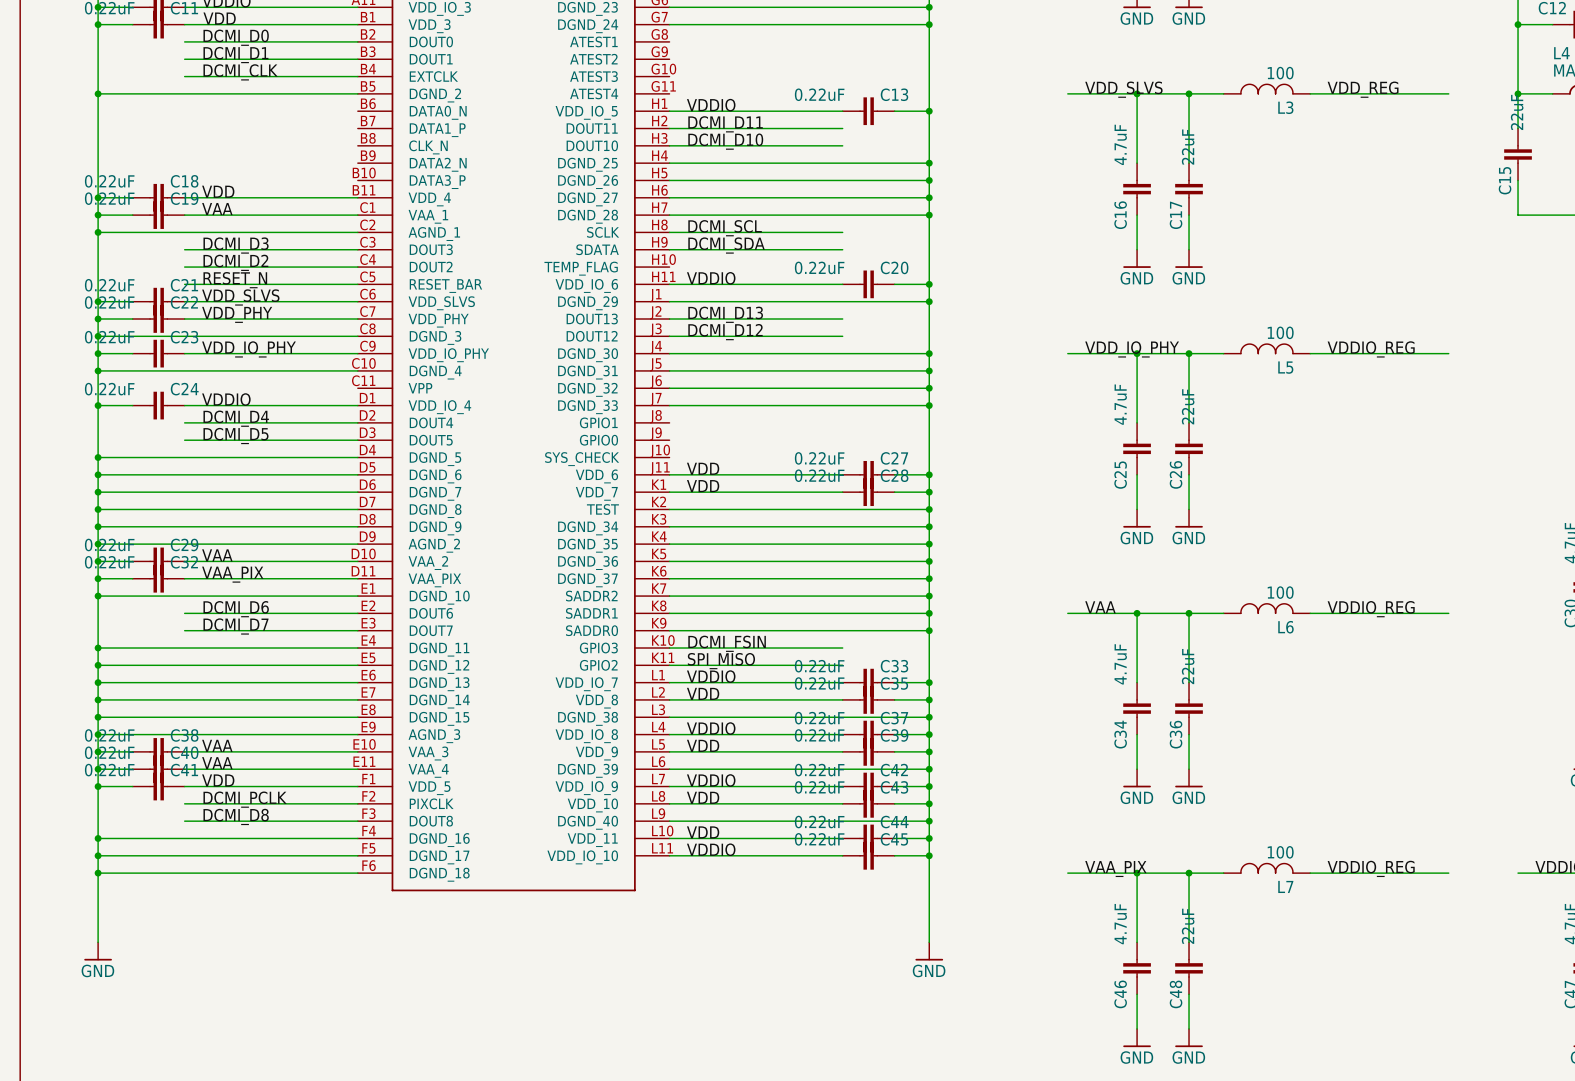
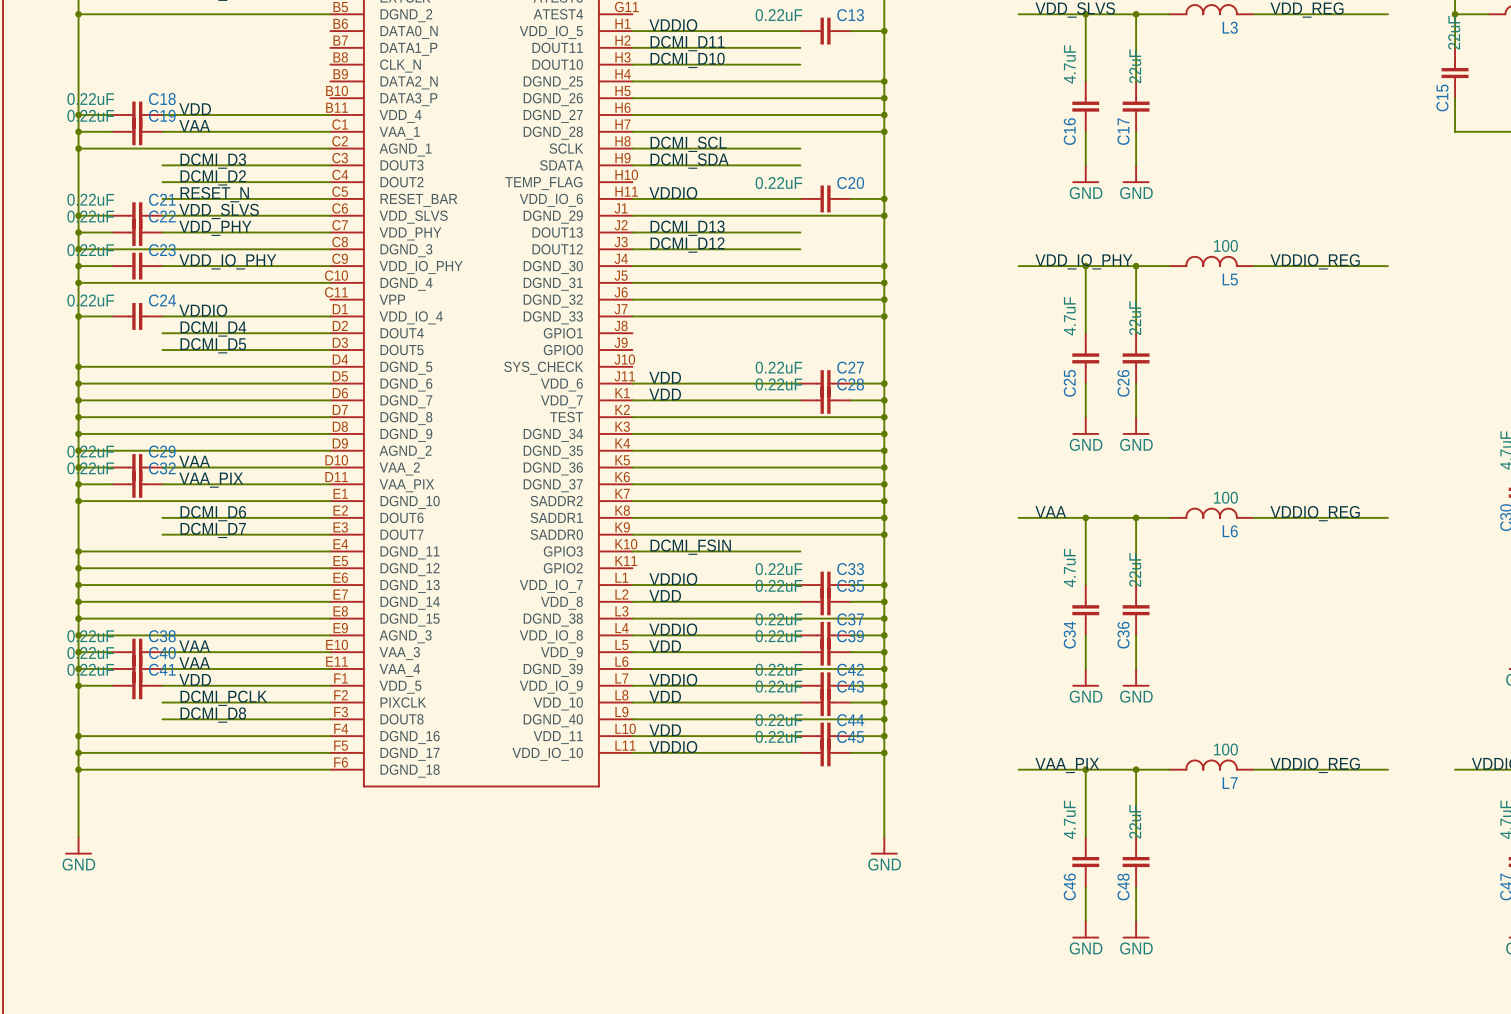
label: SPI_MISO (721, 661) -> none
wire: (669, 665) (842, 665) -> none

